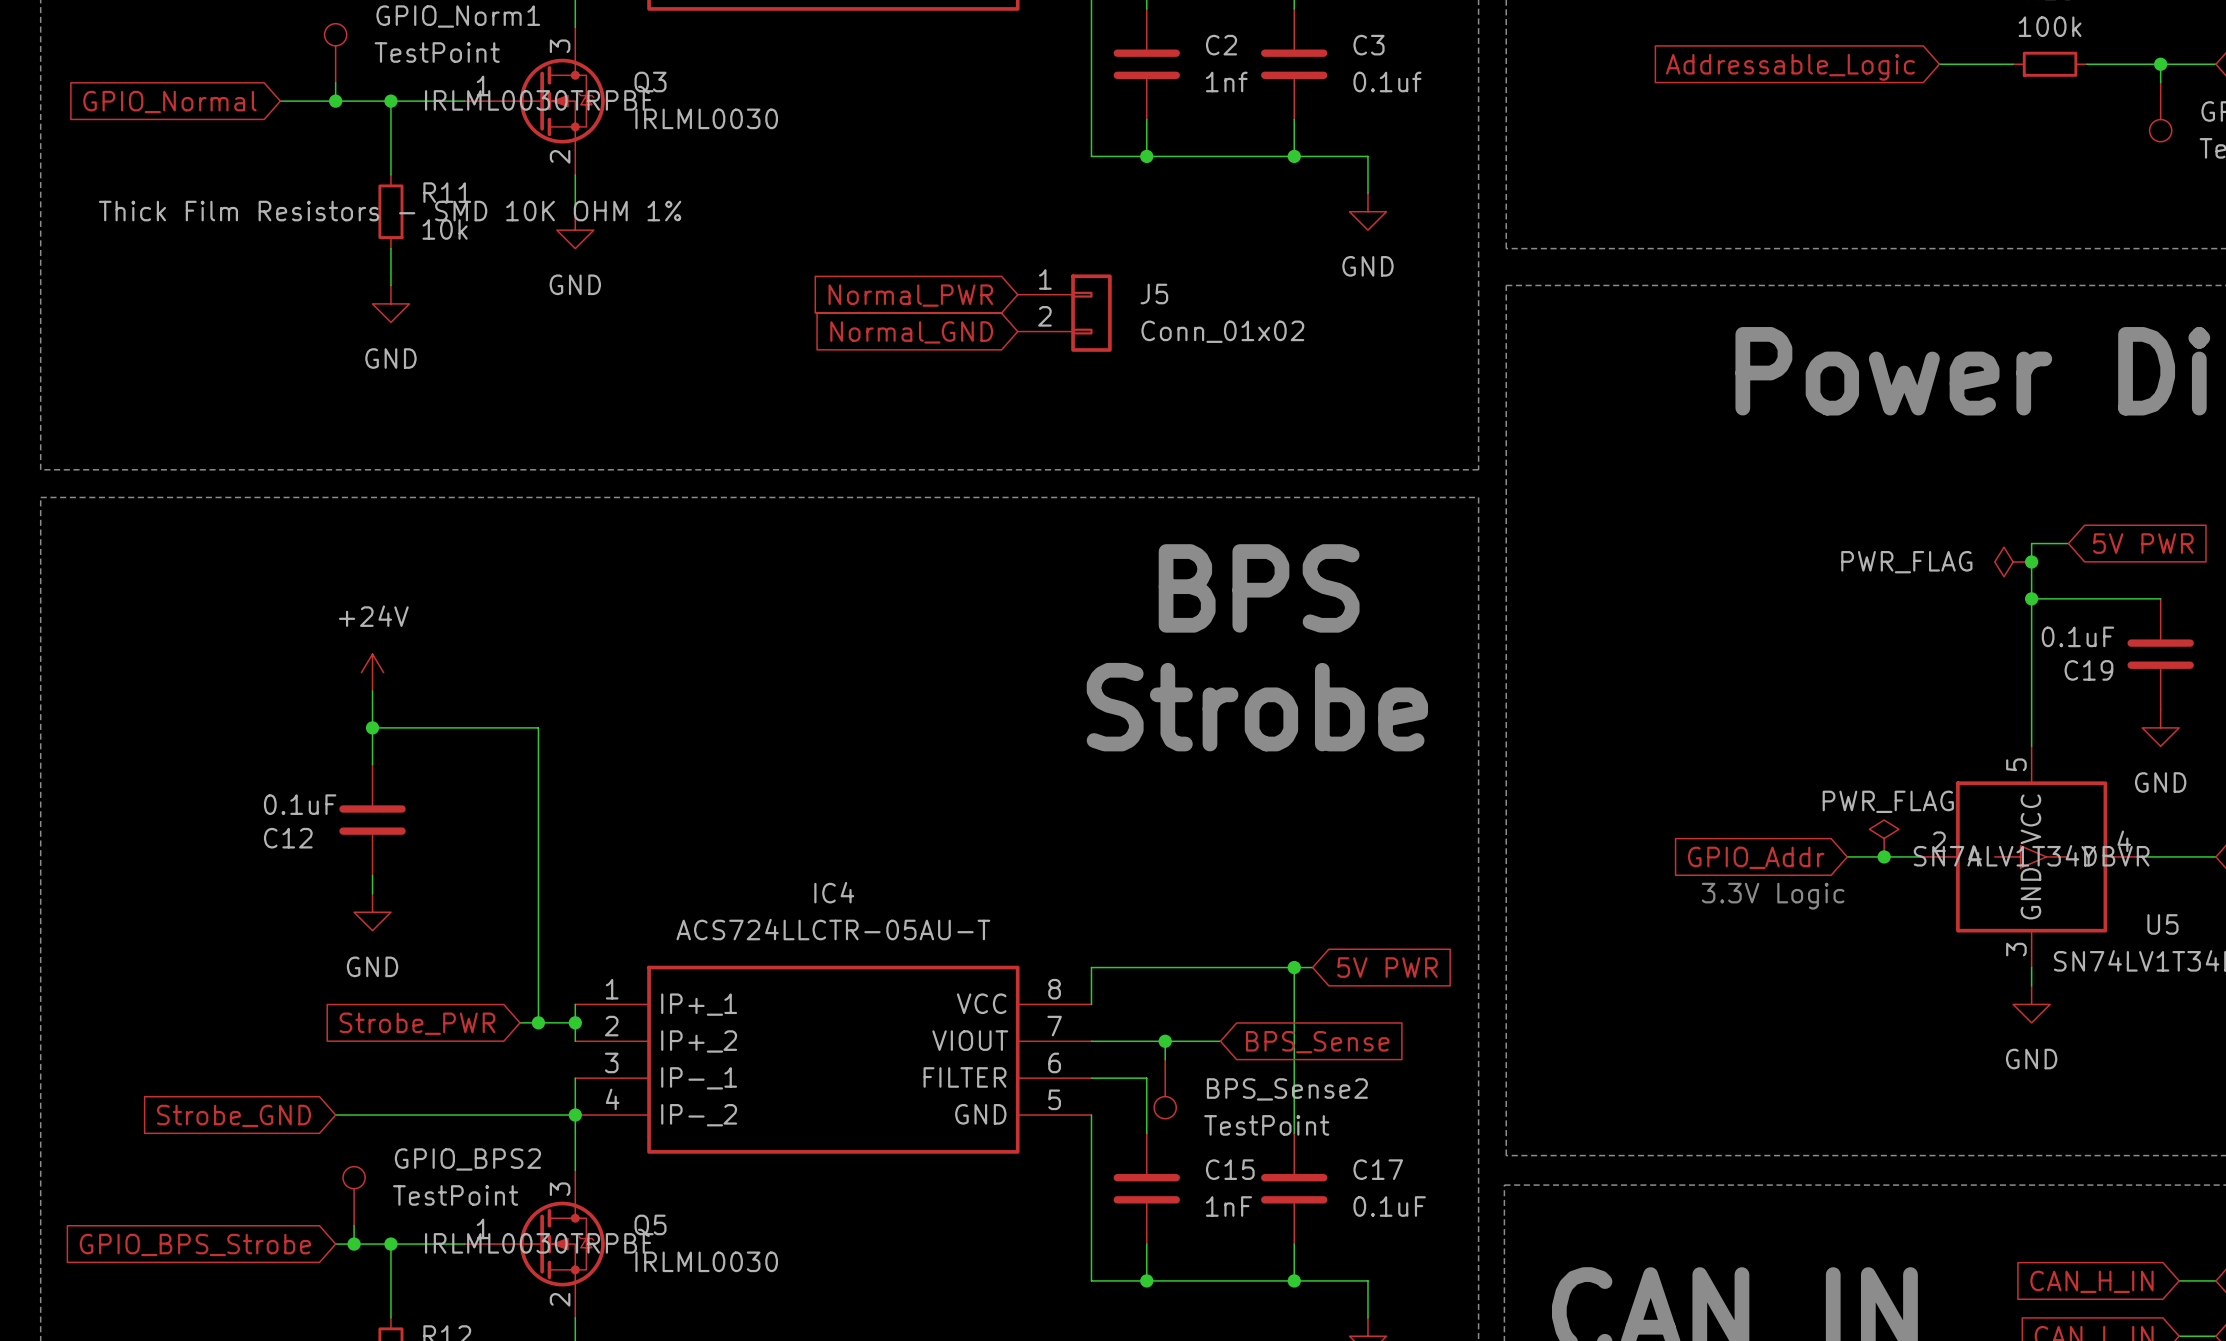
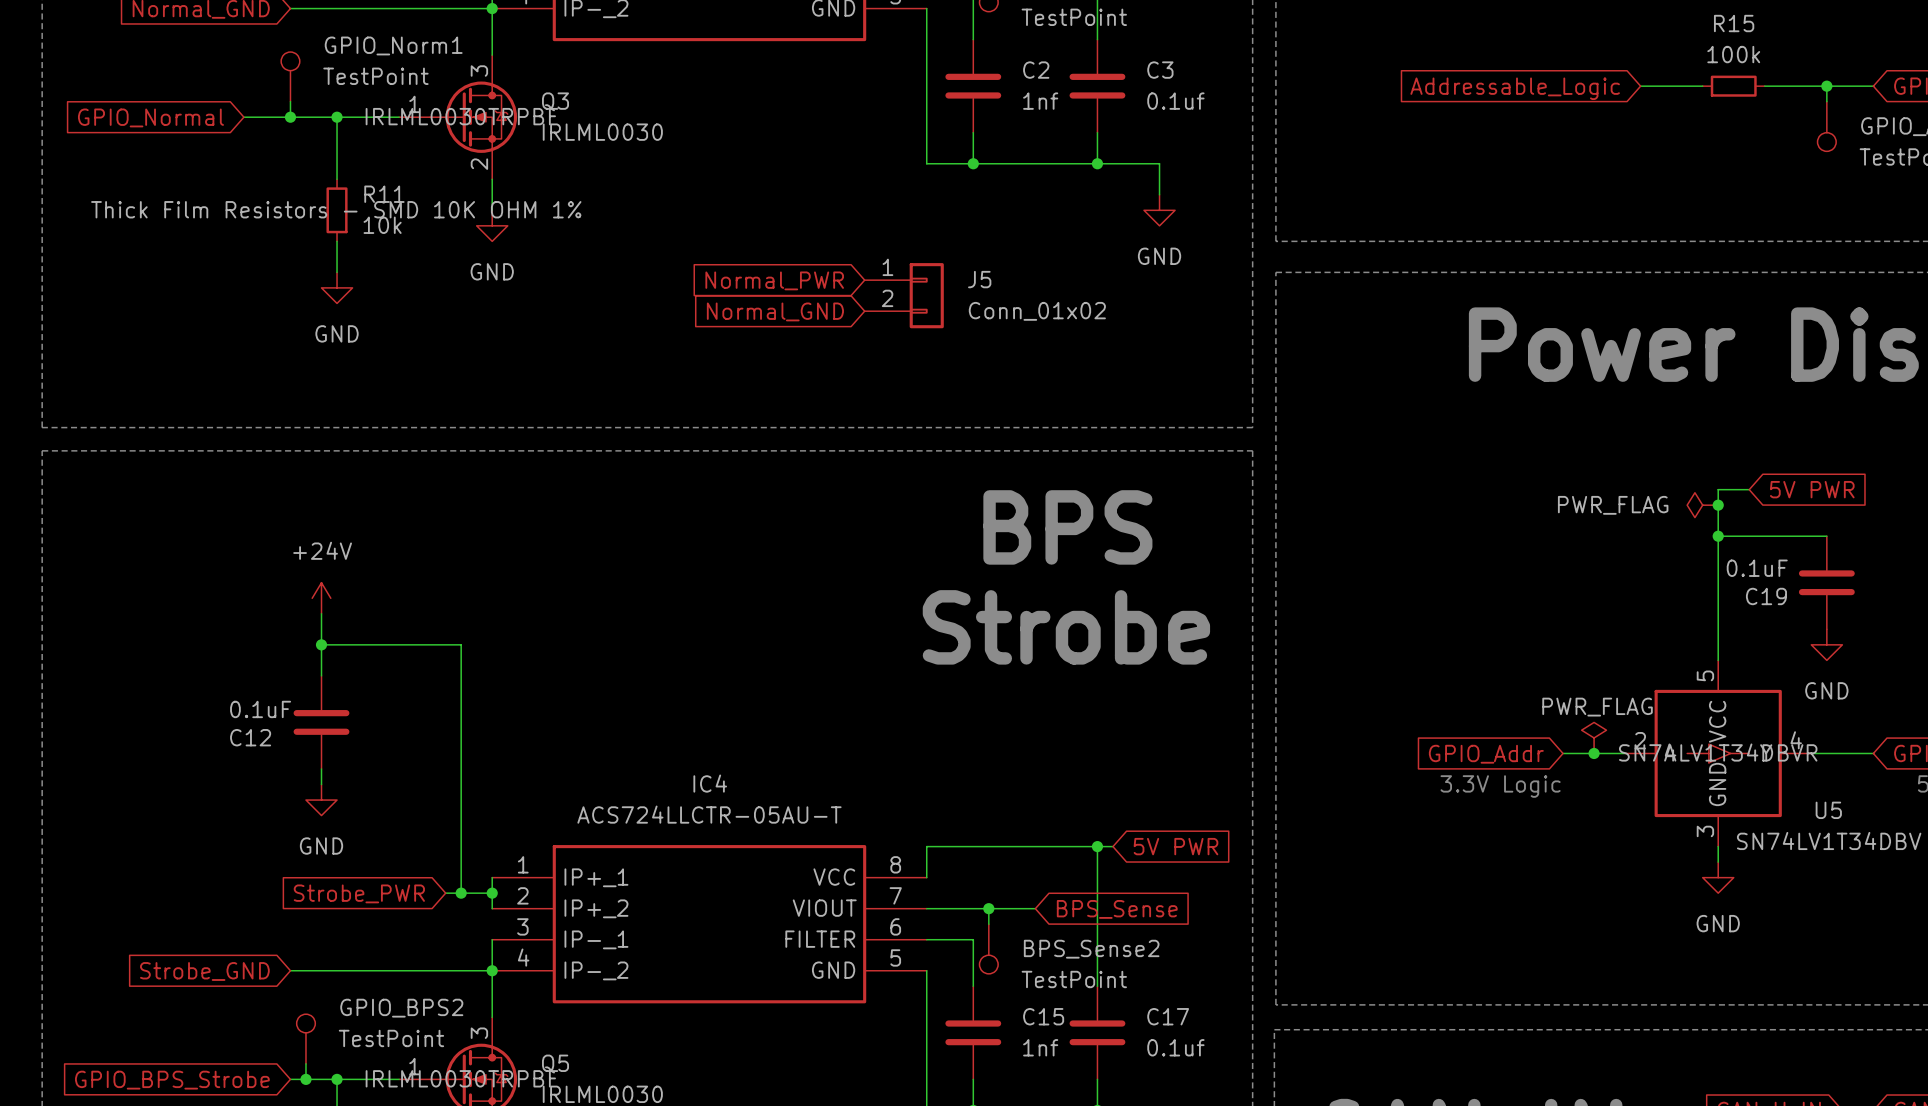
C15 value: 1nF (1228, 1206) -> 1nf (1040, 1047)
C17 value: 0.1uF (1389, 1206) -> 0.1uf (1175, 1047)

